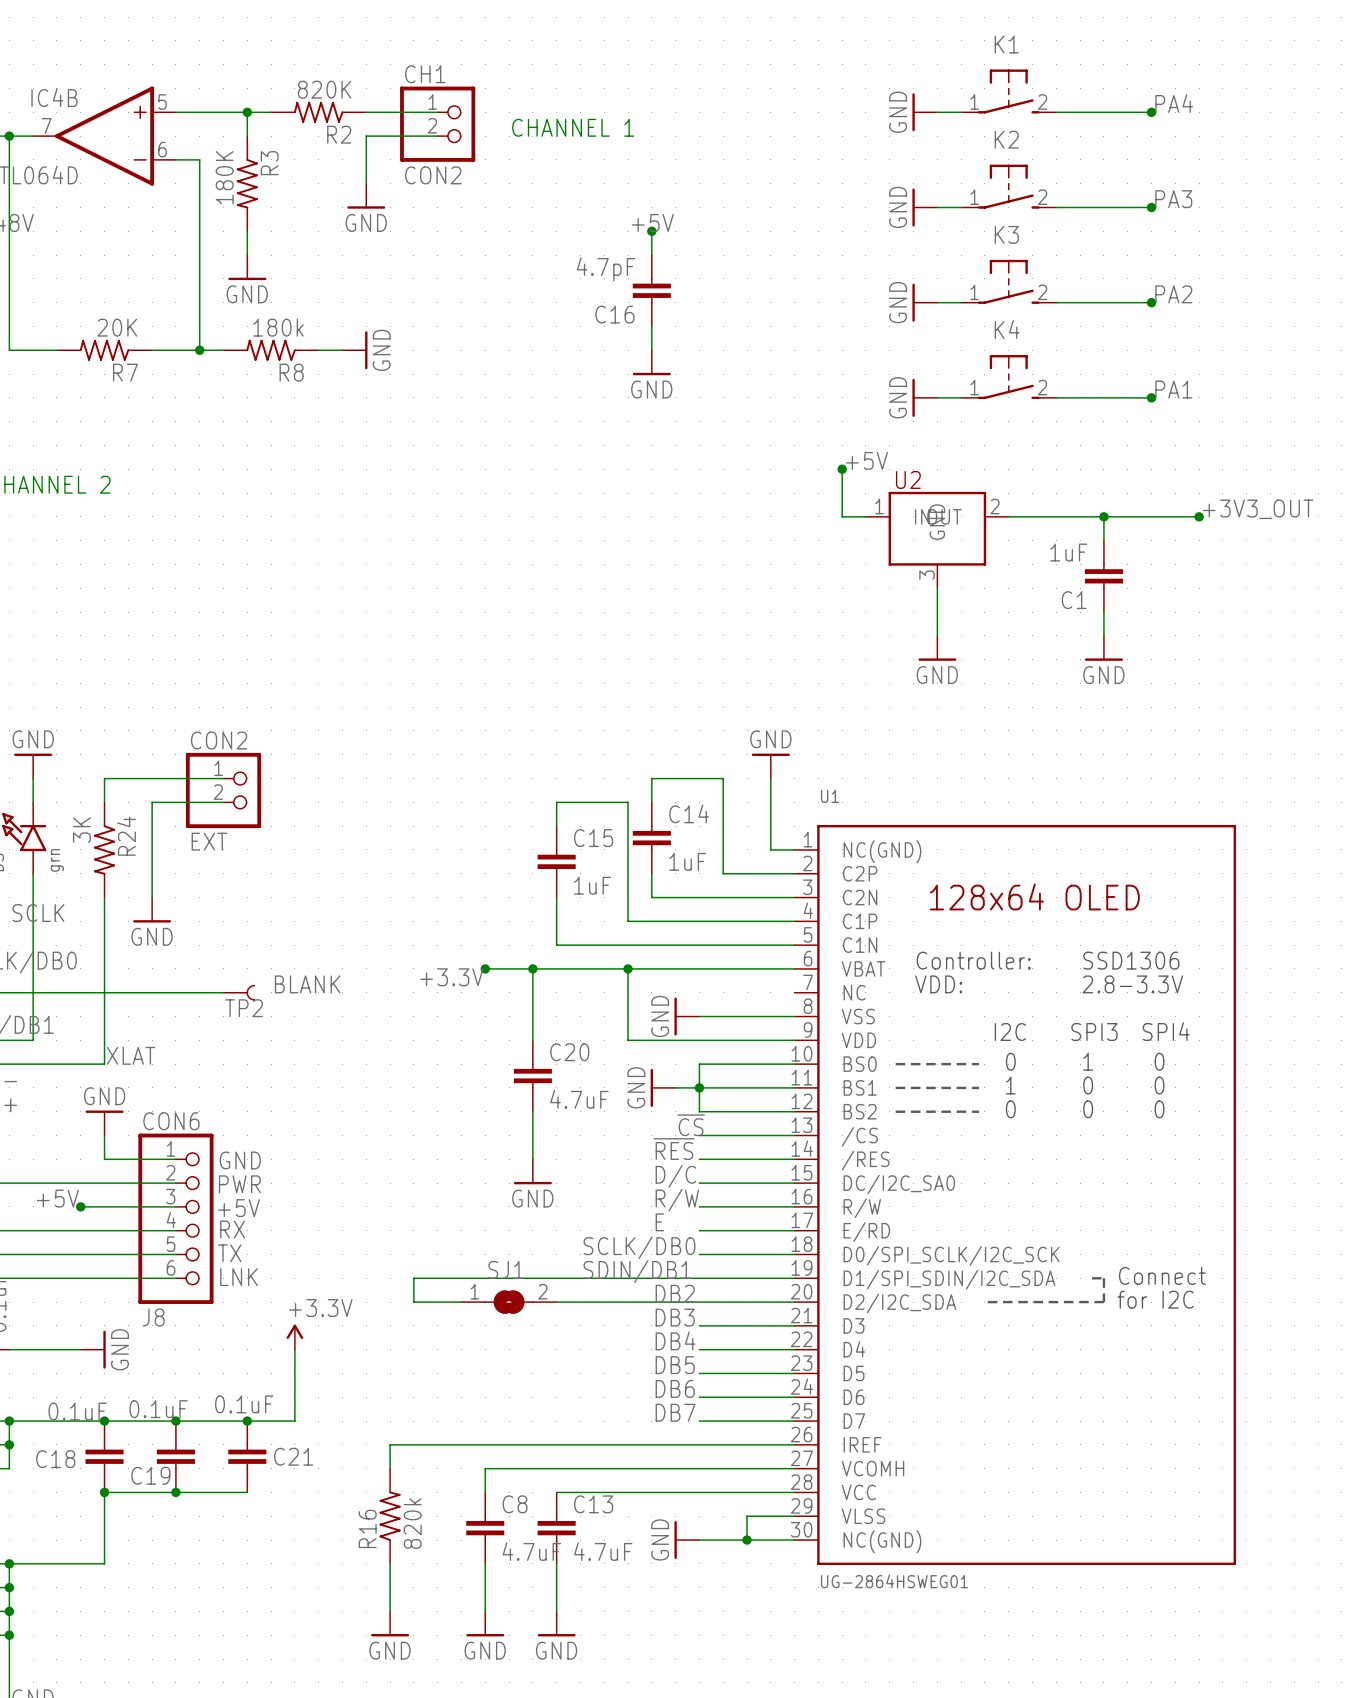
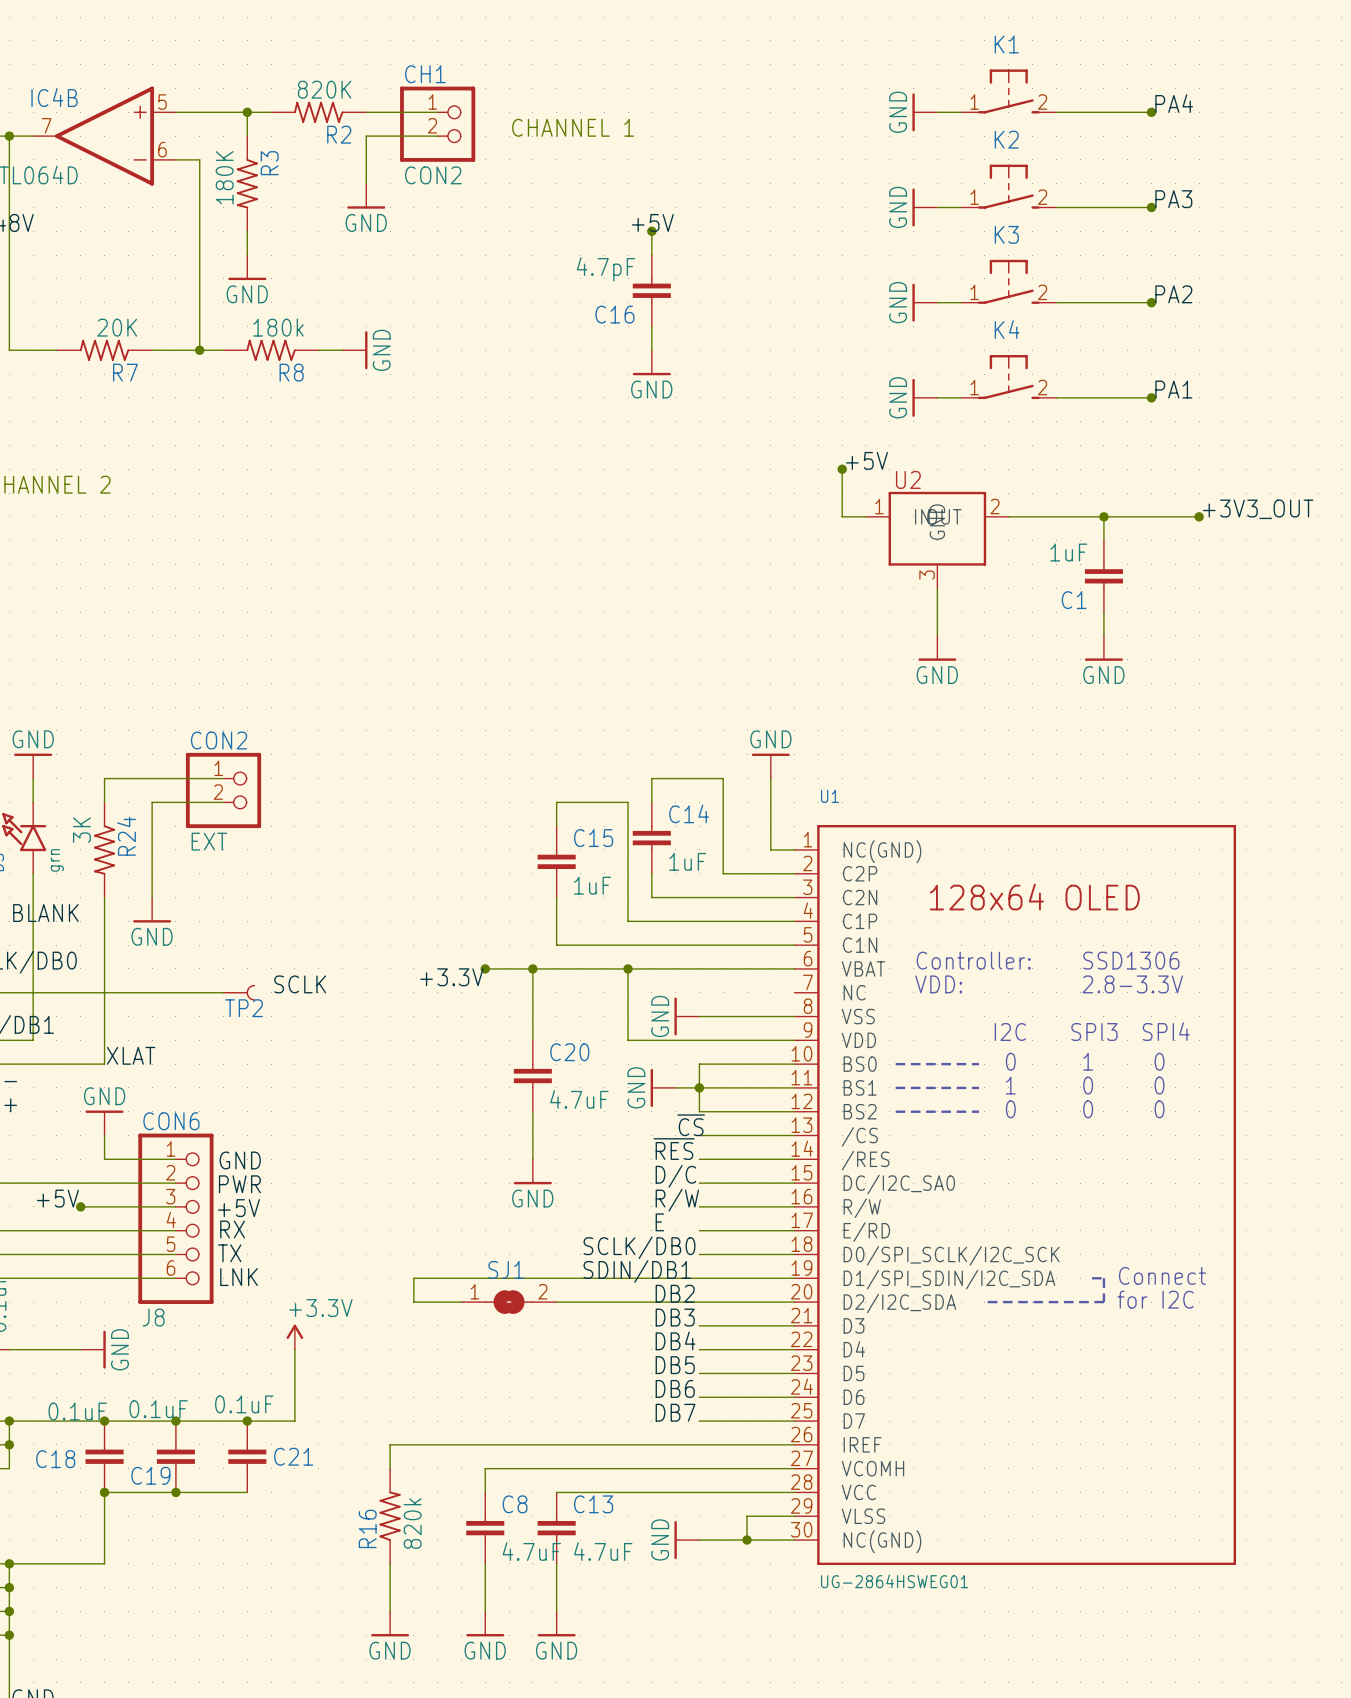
label: SCLK (38, 913) -> BLANK (45, 913)
label: BLANK (307, 984) -> SCLK (300, 984)

